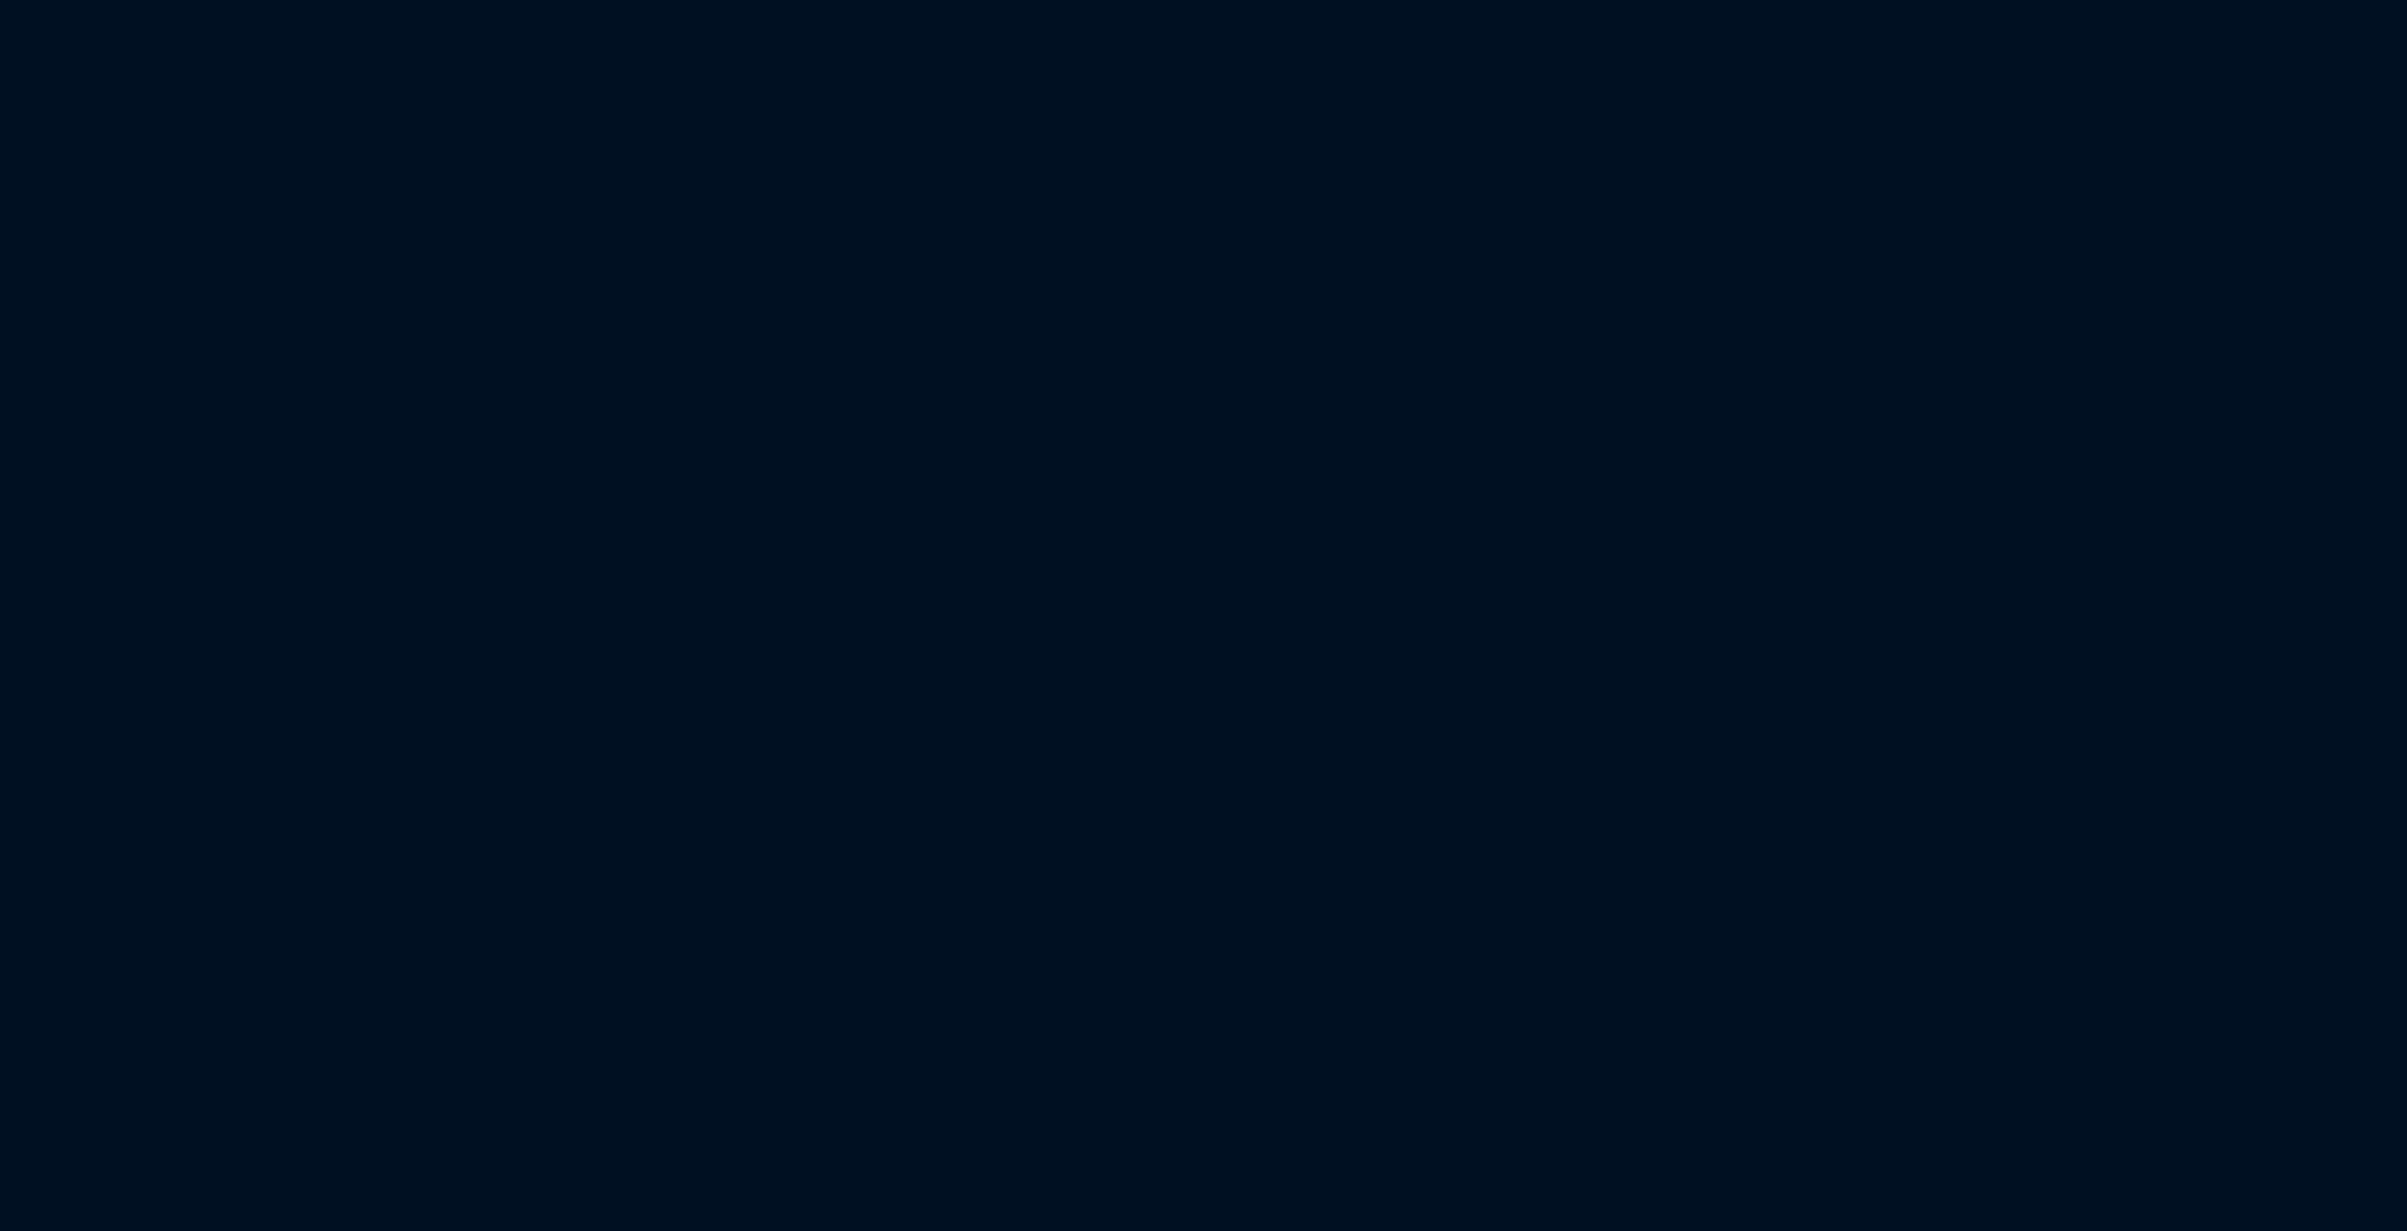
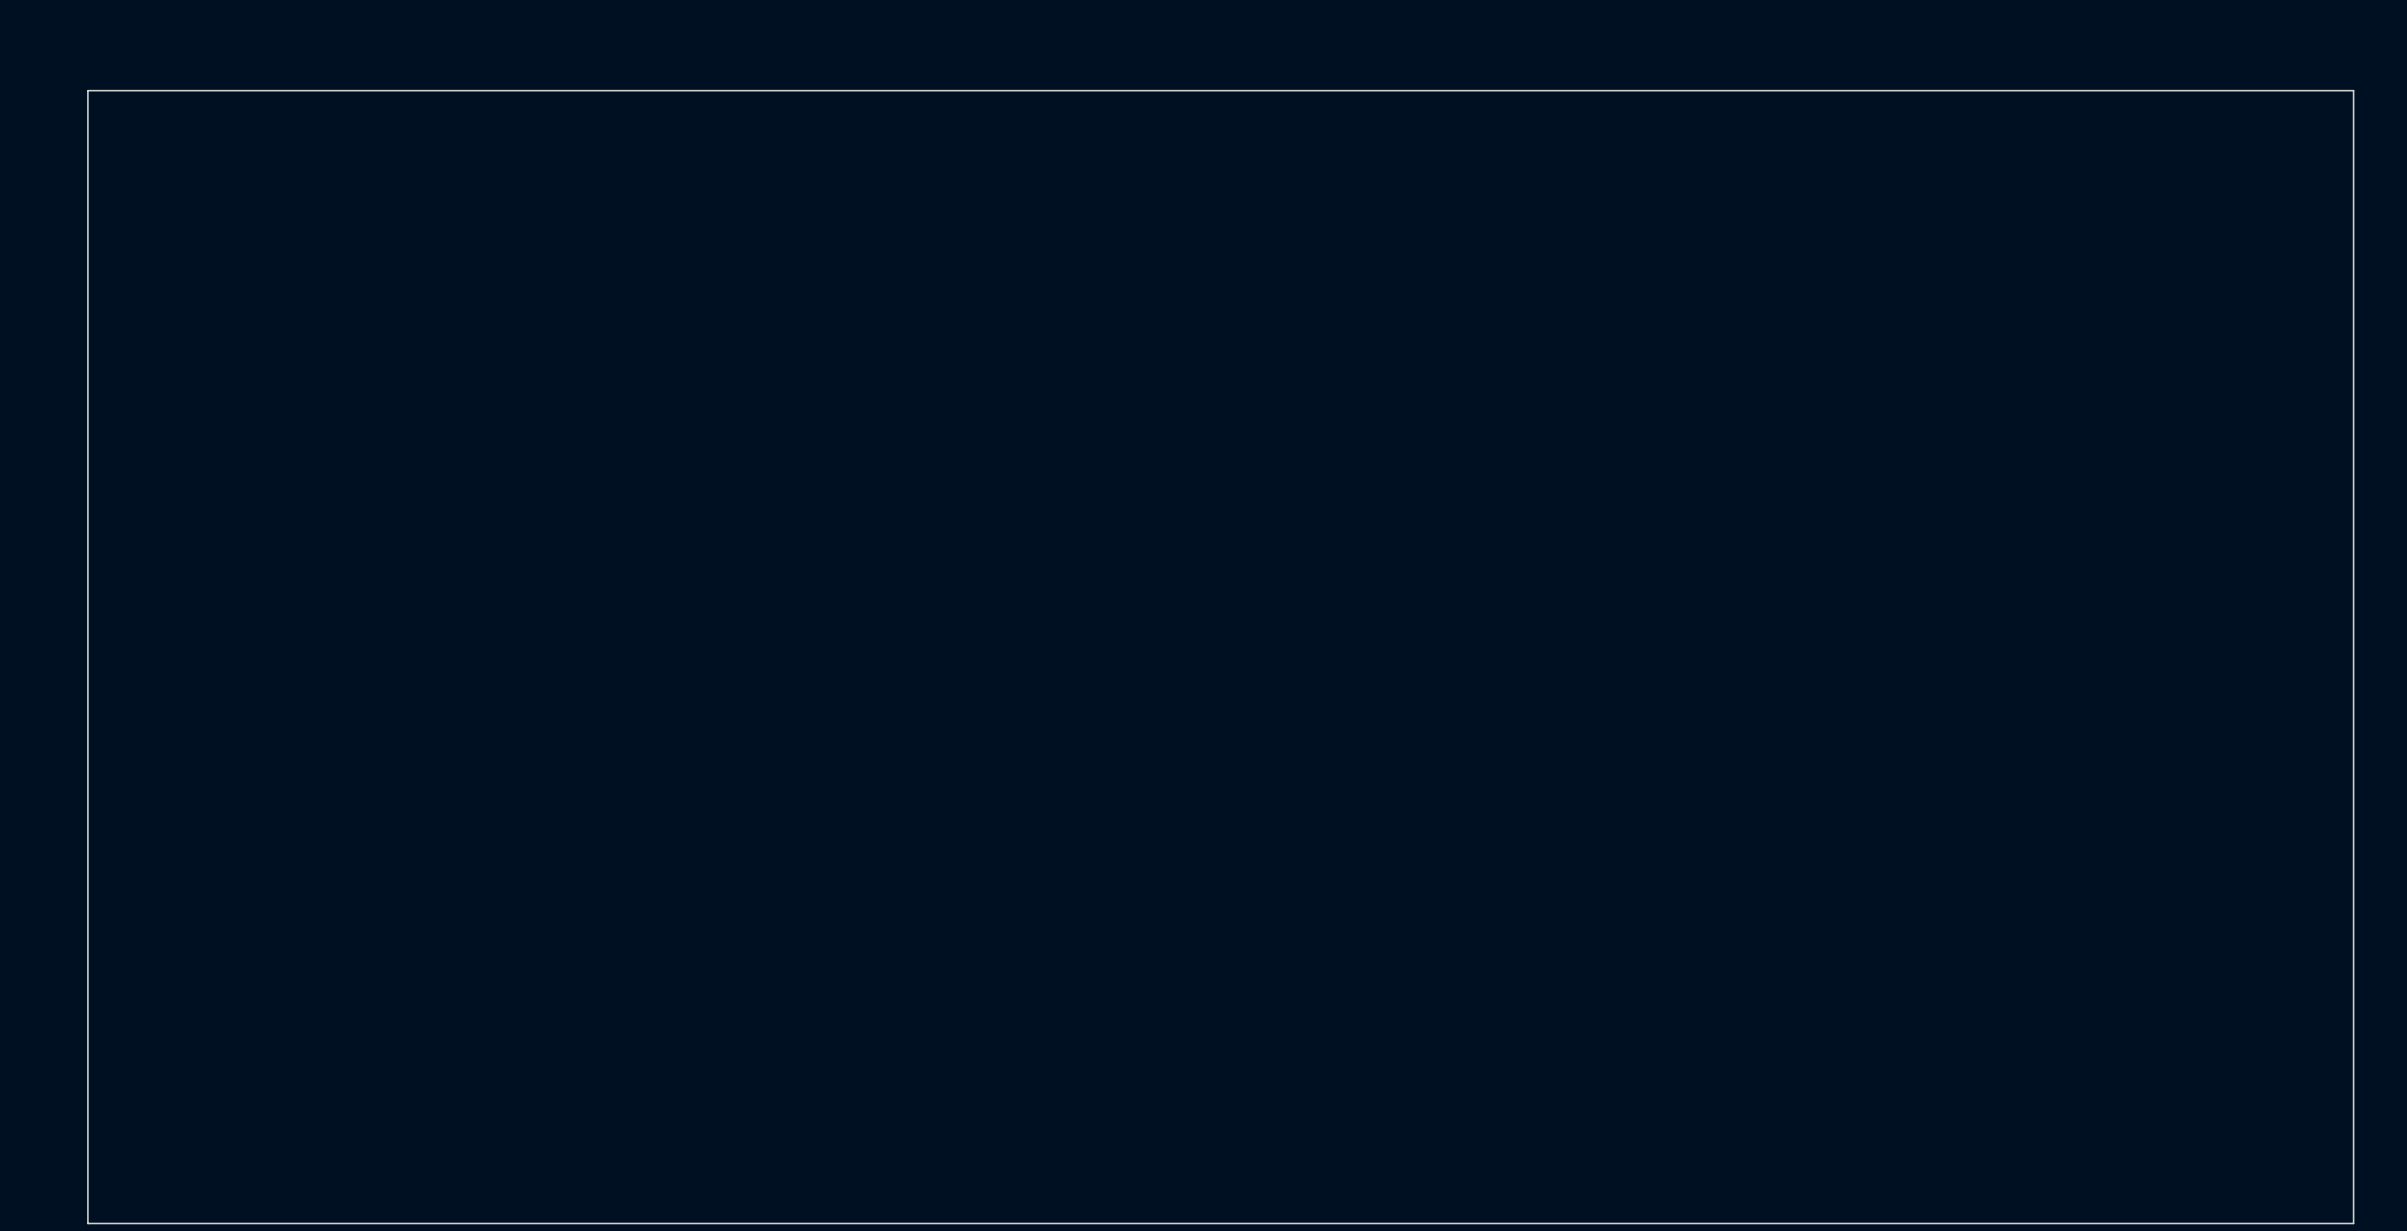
board edge: none -> (2353, 90) (87, 90) (87, 1223) (2353, 1223) (2353, 90)

